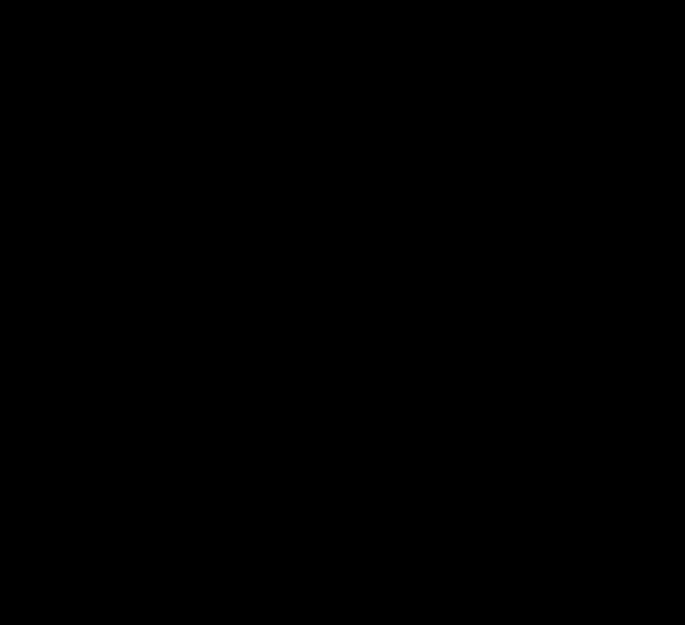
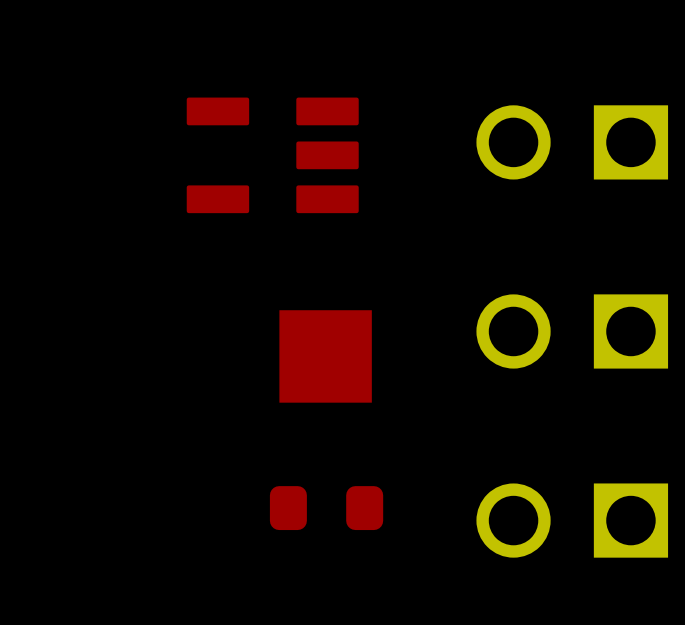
part: none -> (572, 142)
part: none -> (272, 155)
part: none -> (572, 331)
part: none -> (325, 356)
part: none -> (326, 508)
part: none -> (572, 520)

